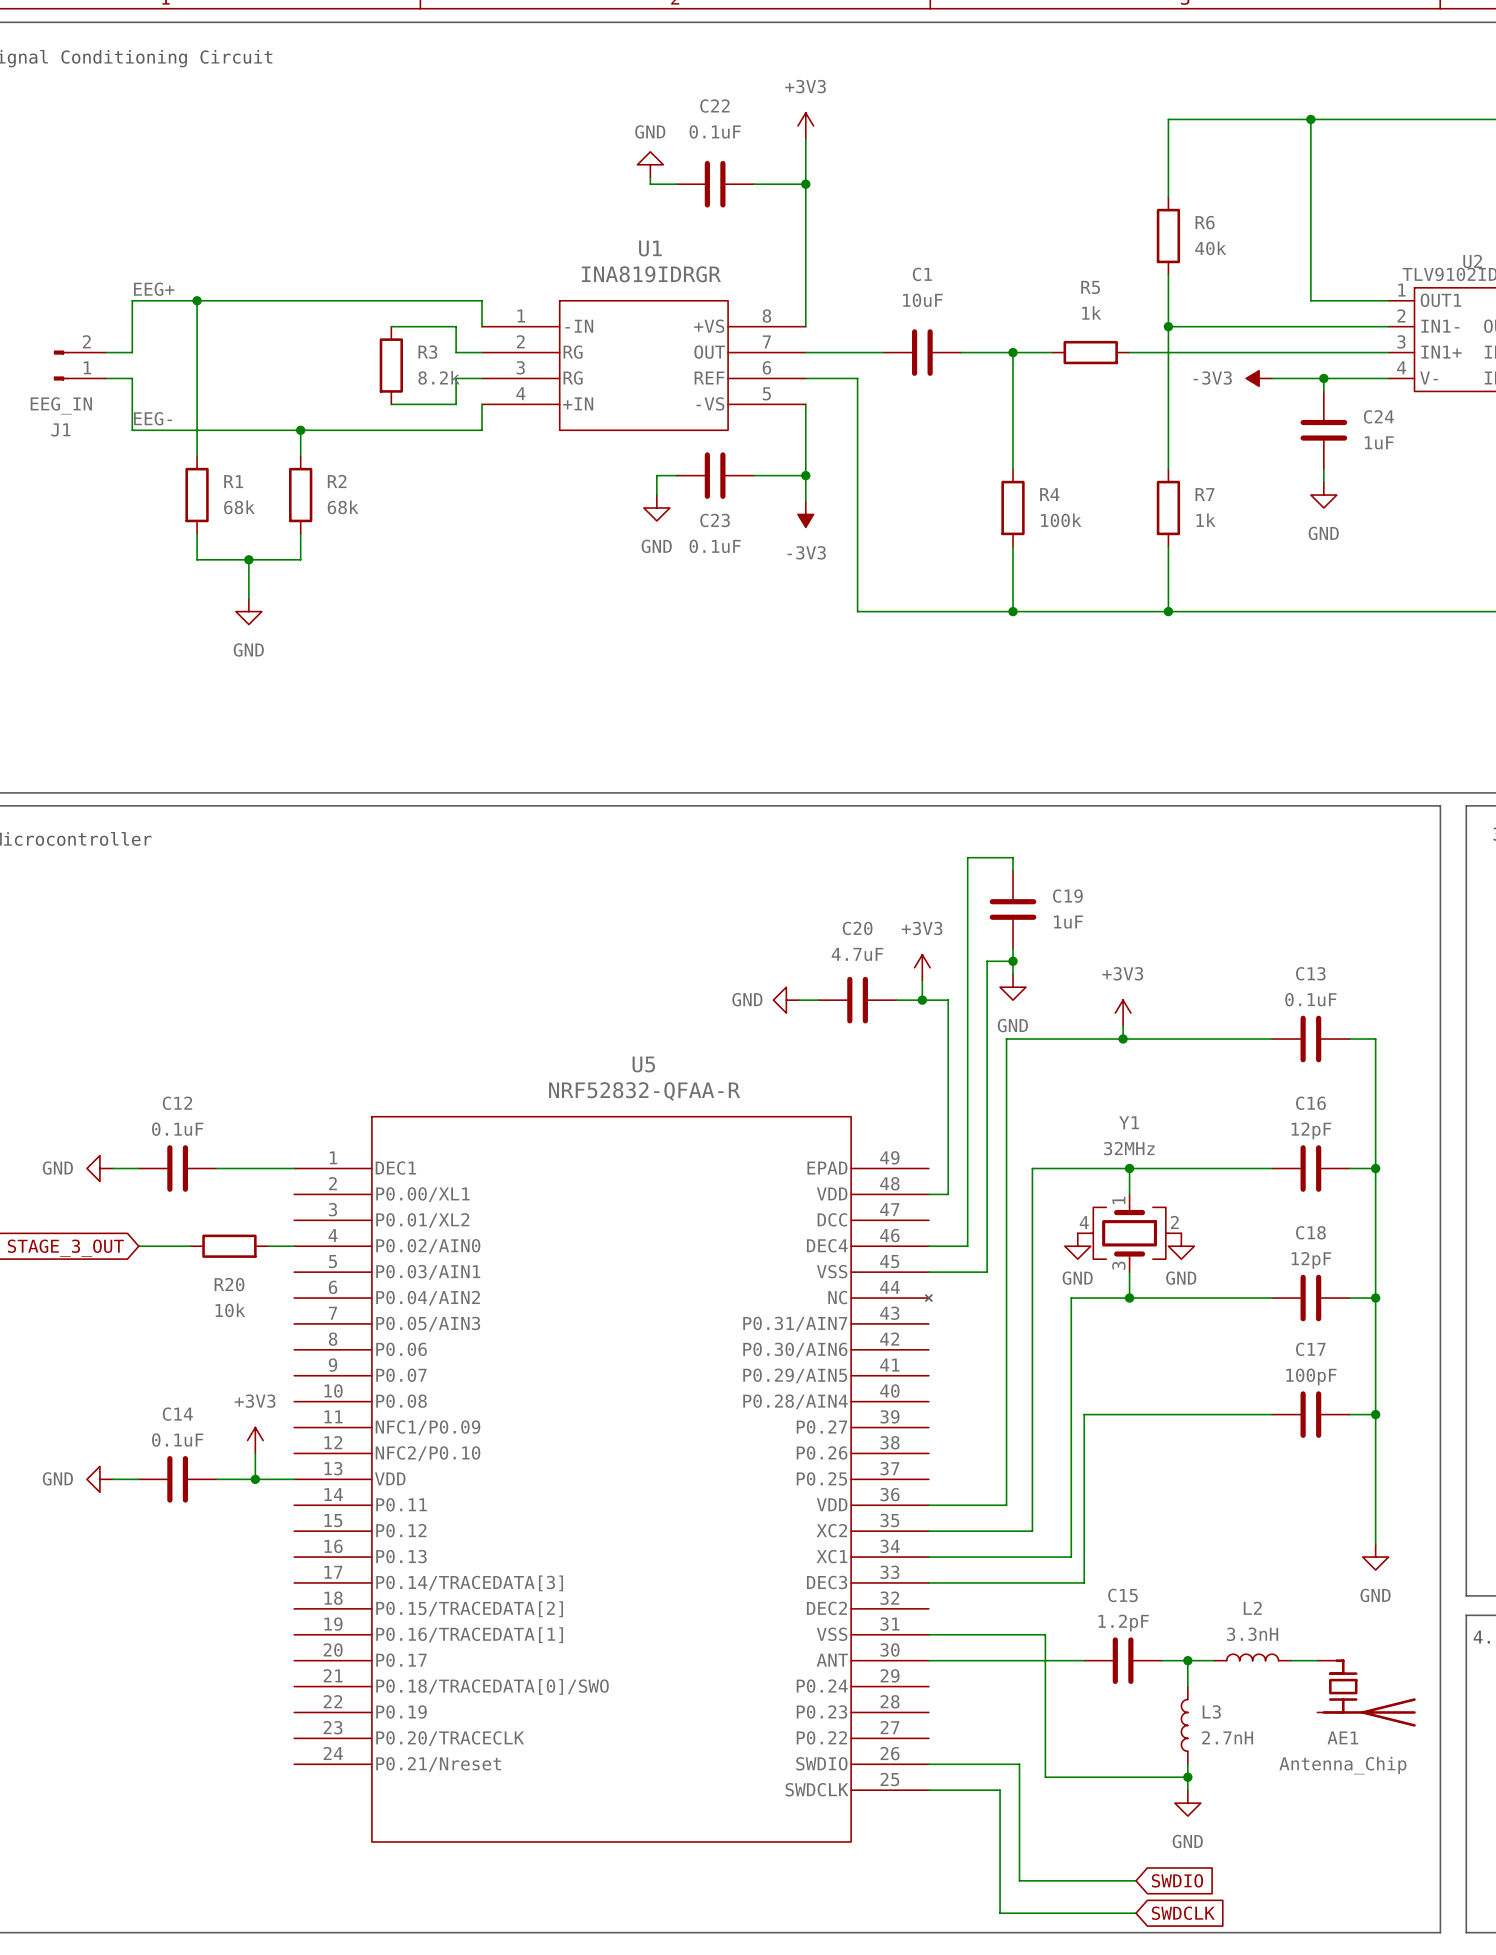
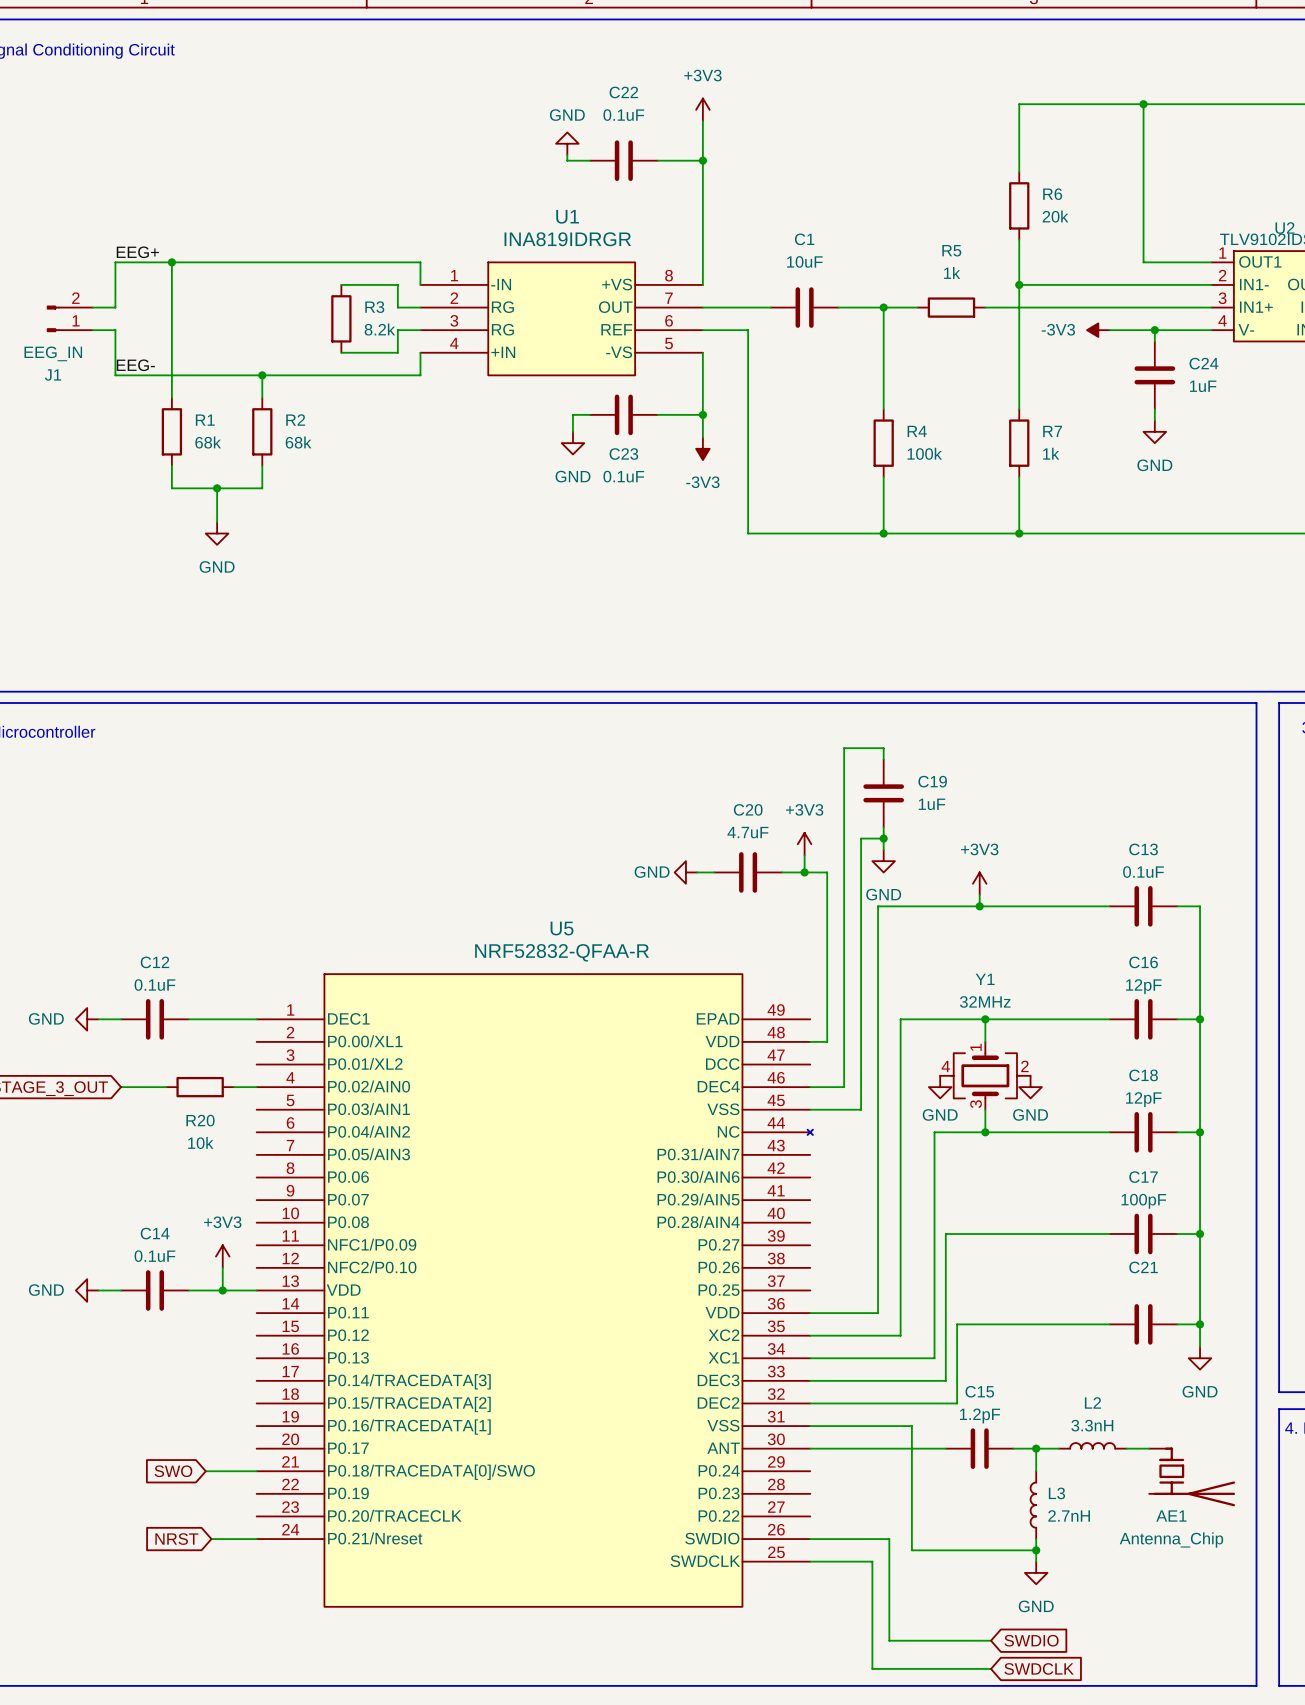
R6 value: 40k (1210, 248) -> 20k (1055, 216)
wire: none -> (1109, 1324) (957, 1324) (957, 1403) (810, 1403)
C21: none -> (1143, 1324)
wire: none -> (1177, 1324) (1200, 1324)
junction: none -> (1200, 1324)
global label: none -> SWO (173, 1471)
wire: none -> (205, 1471) (256, 1471)
global label: none -> NRST (176, 1539)
wire: none -> (211, 1539) (256, 1539)

